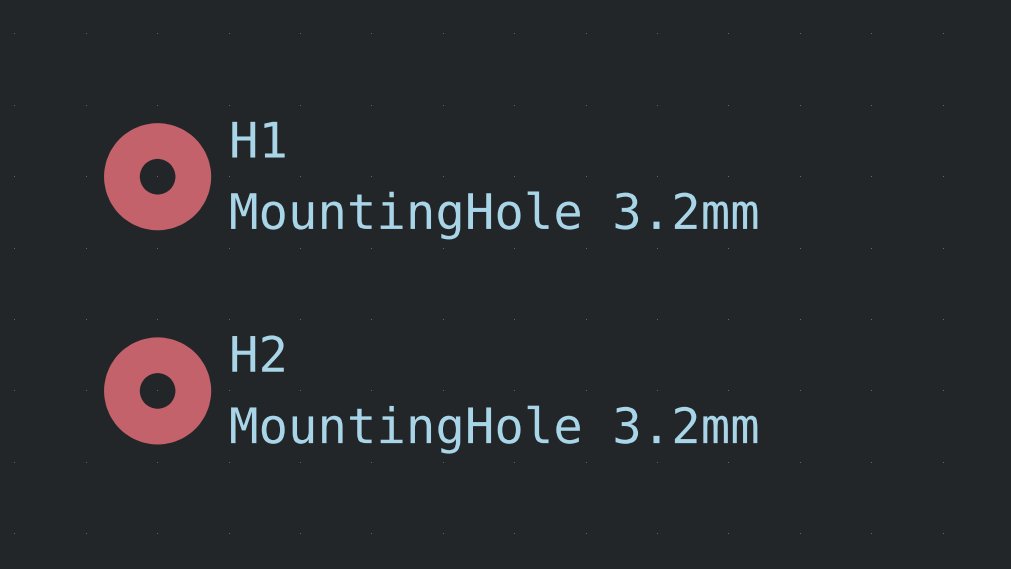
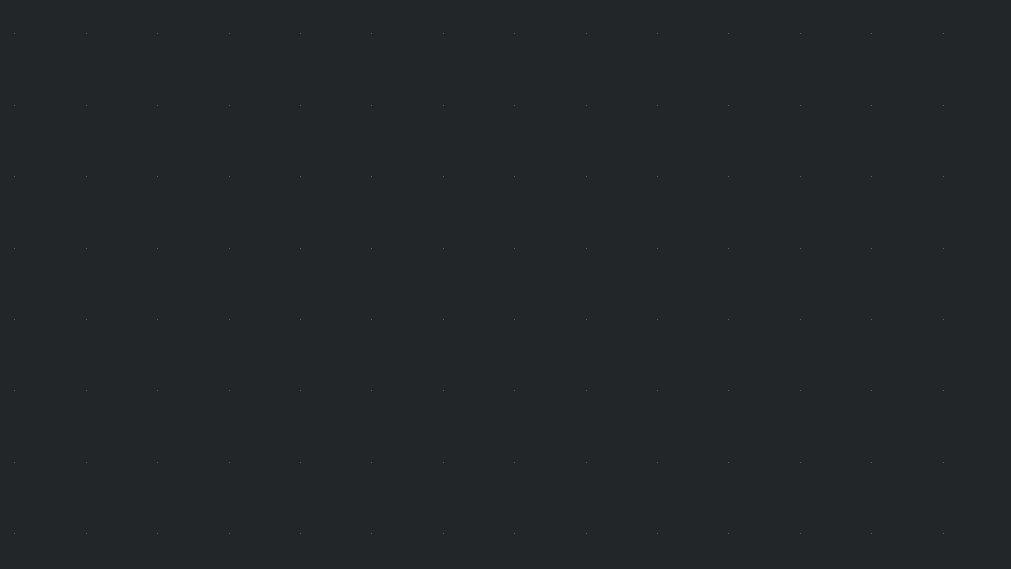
H1: MountingHole 3.2mm (157, 176) -> none
H2: MountingHole 3.2mm (157, 390) -> none

